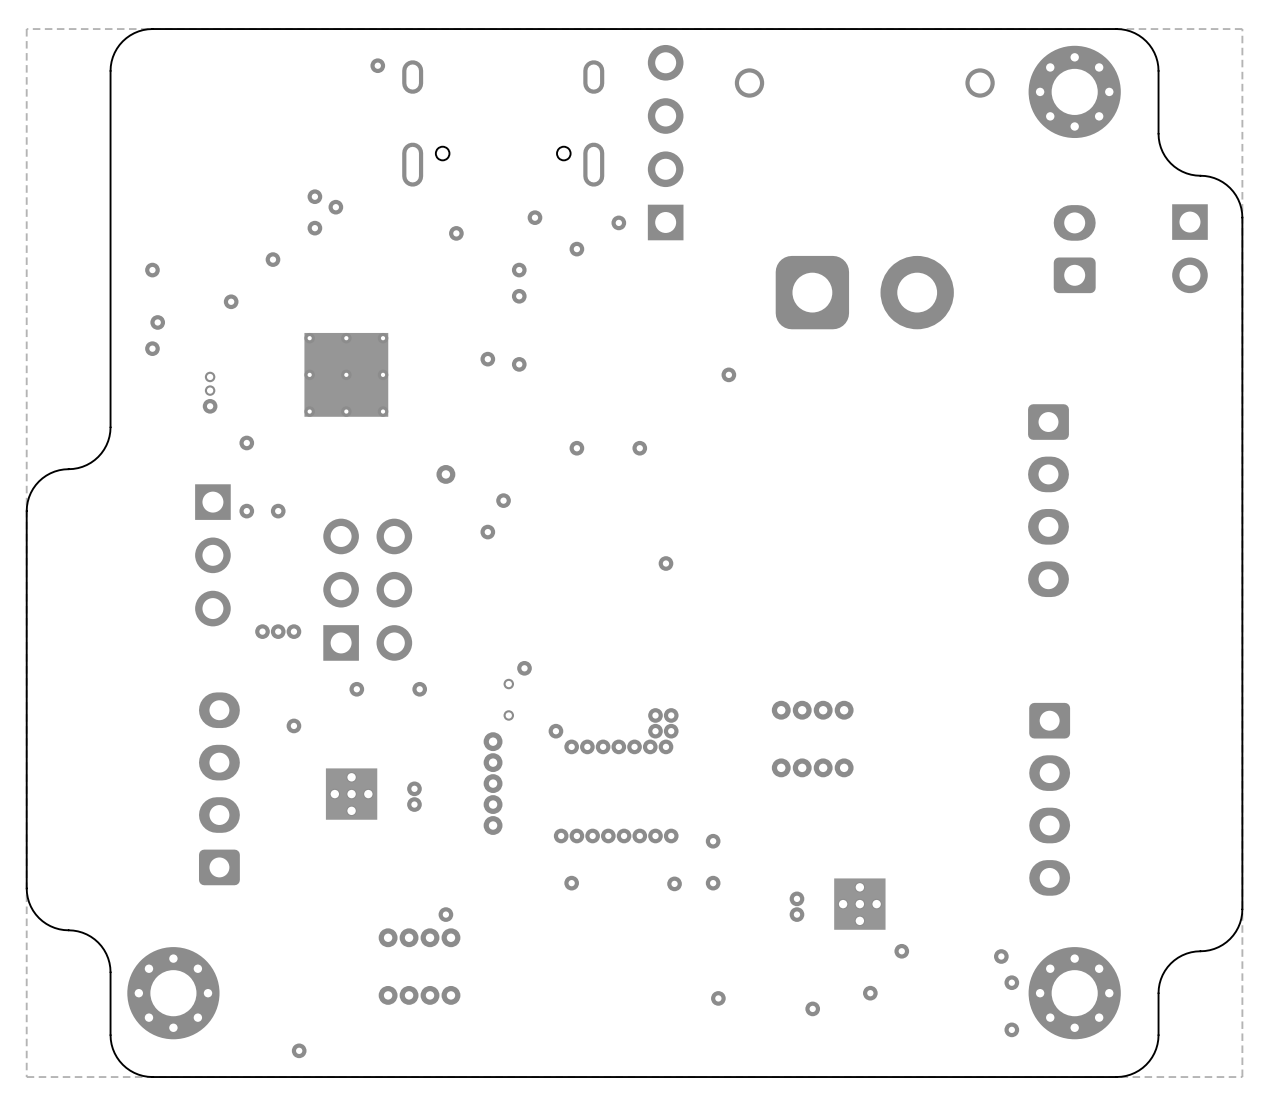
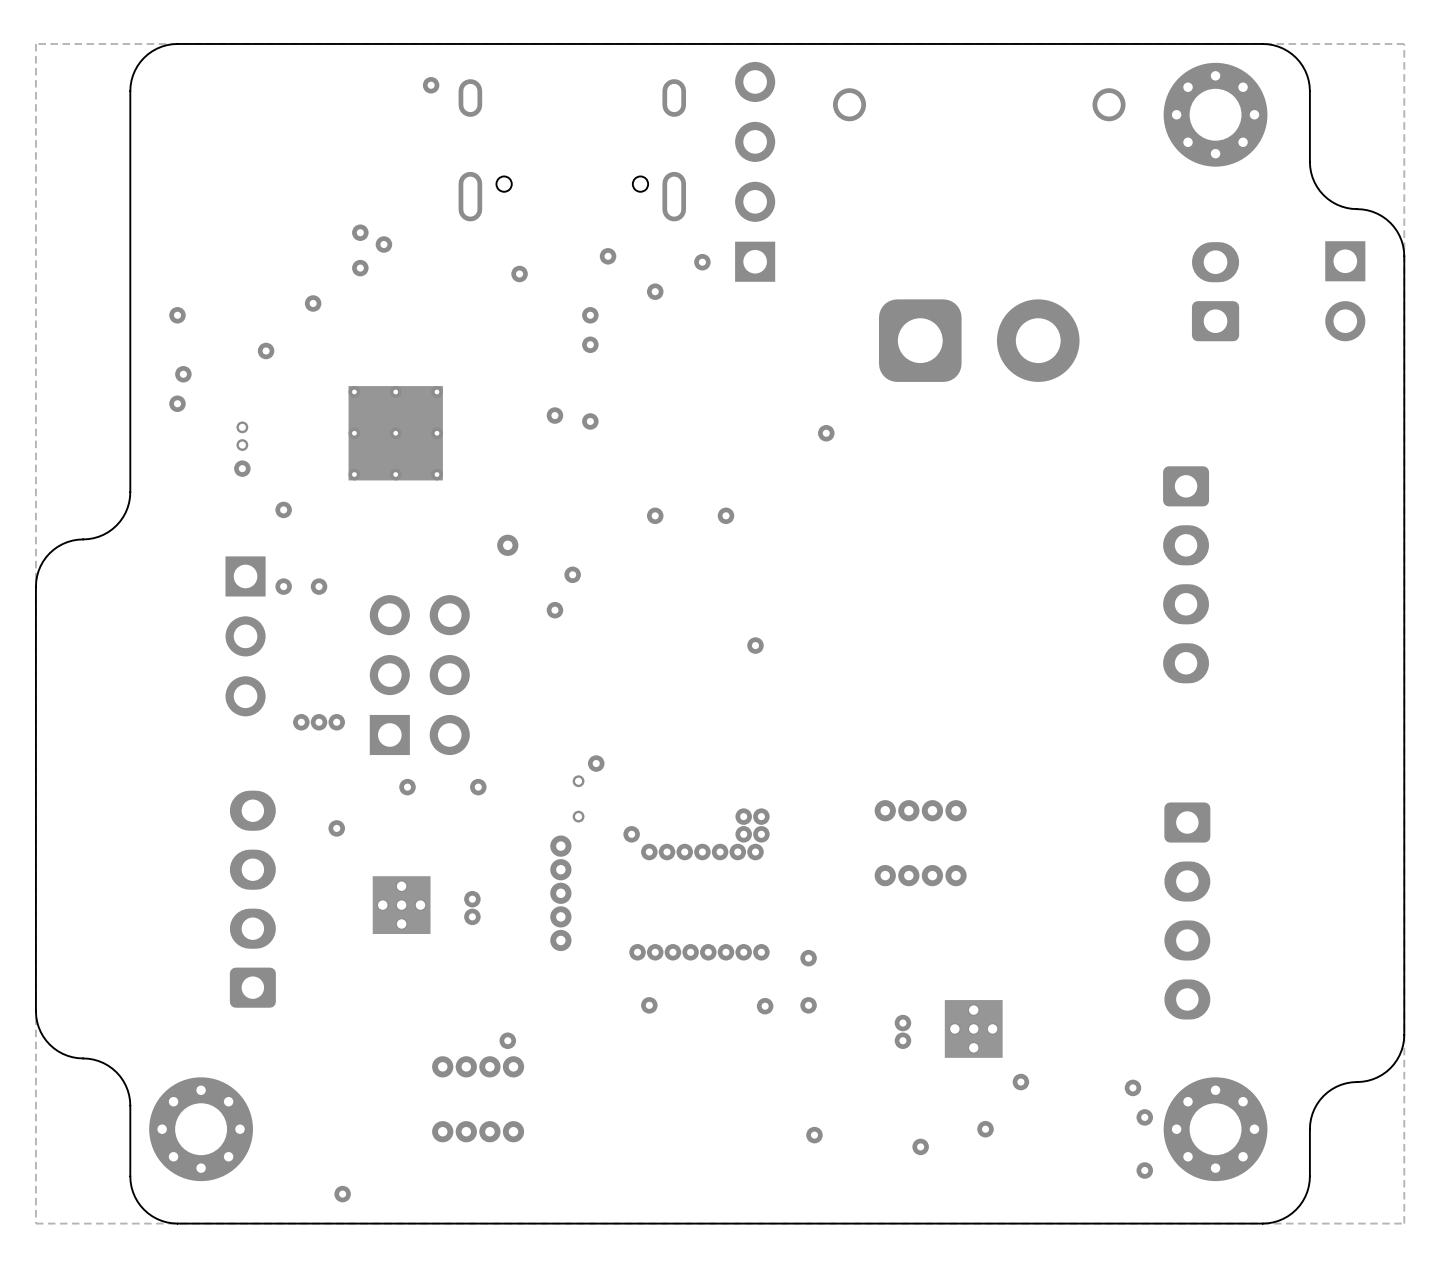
via: none -> (242, 427)
via: (210, 376) -> none
via: none -> (242, 445)
via: (210, 390) -> none

